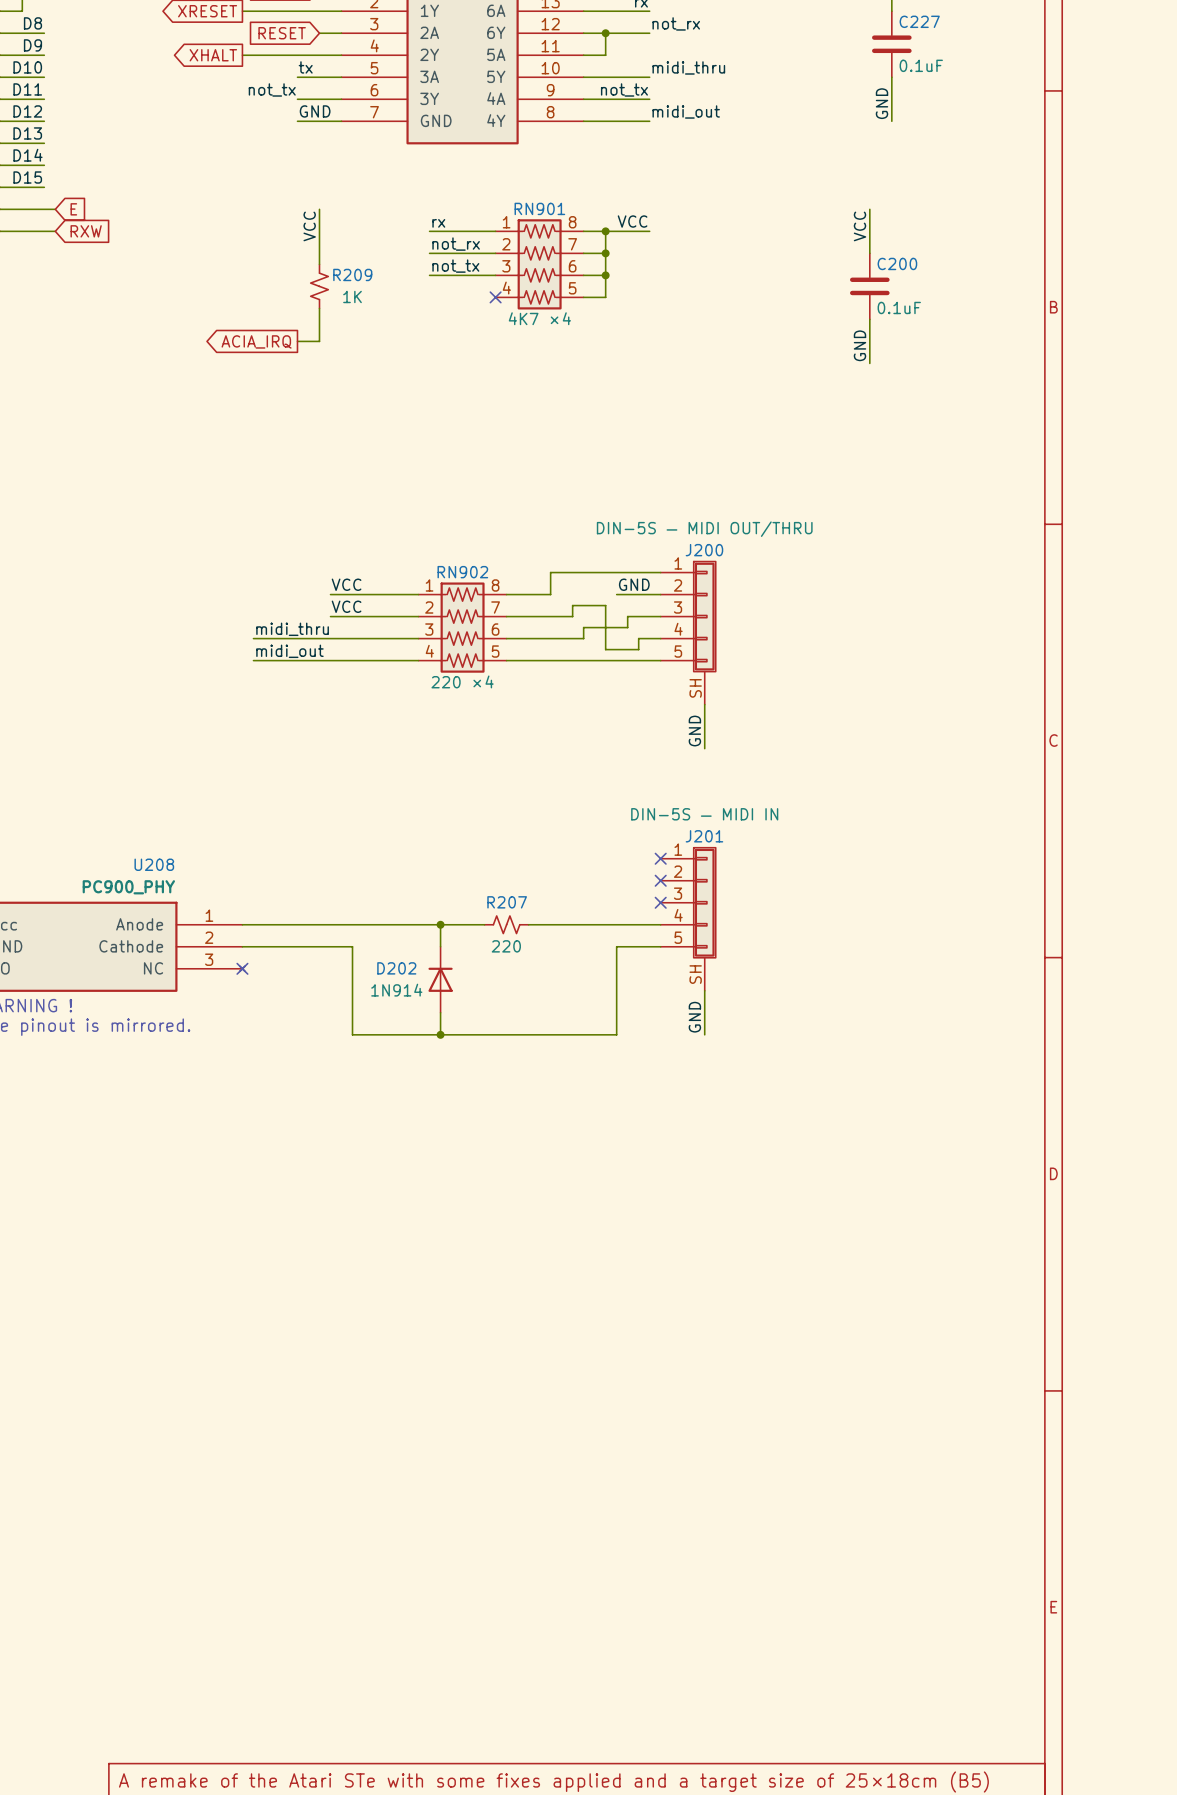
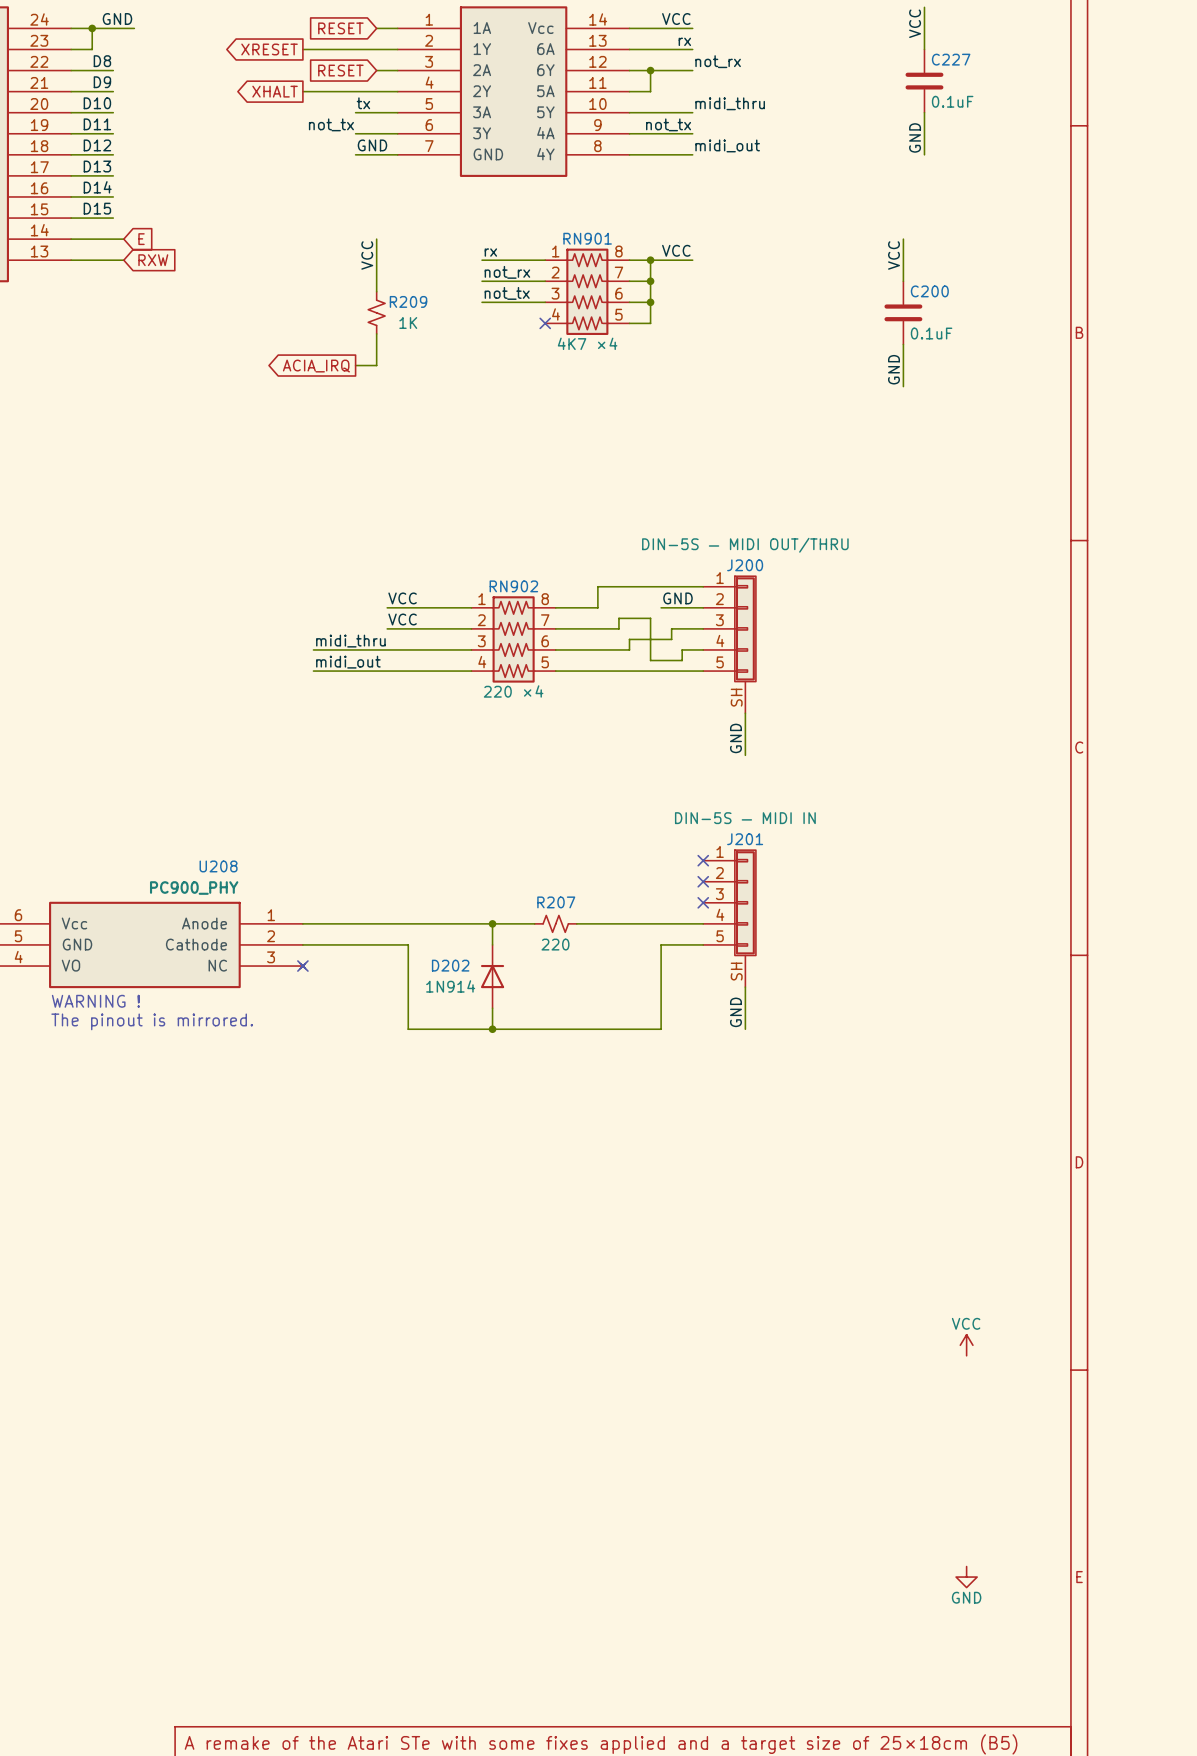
power symbol: none -> VCC (966, 1345)
power symbol: none -> GND (966, 1577)

